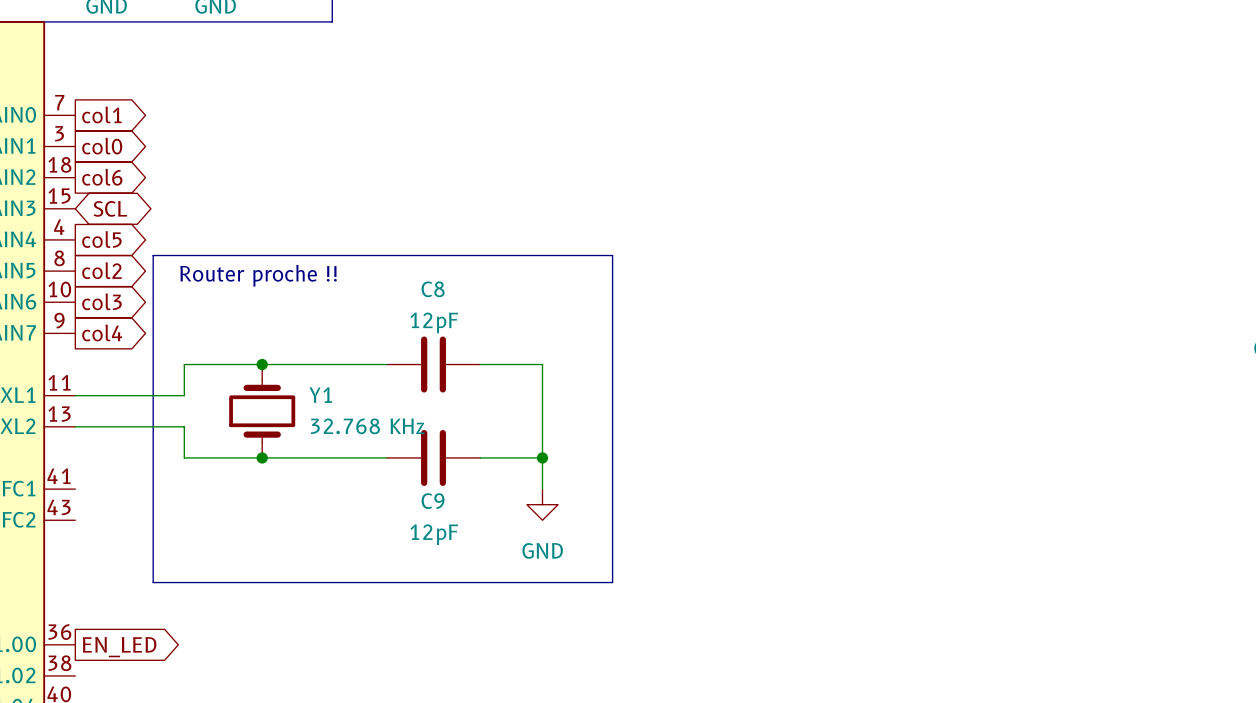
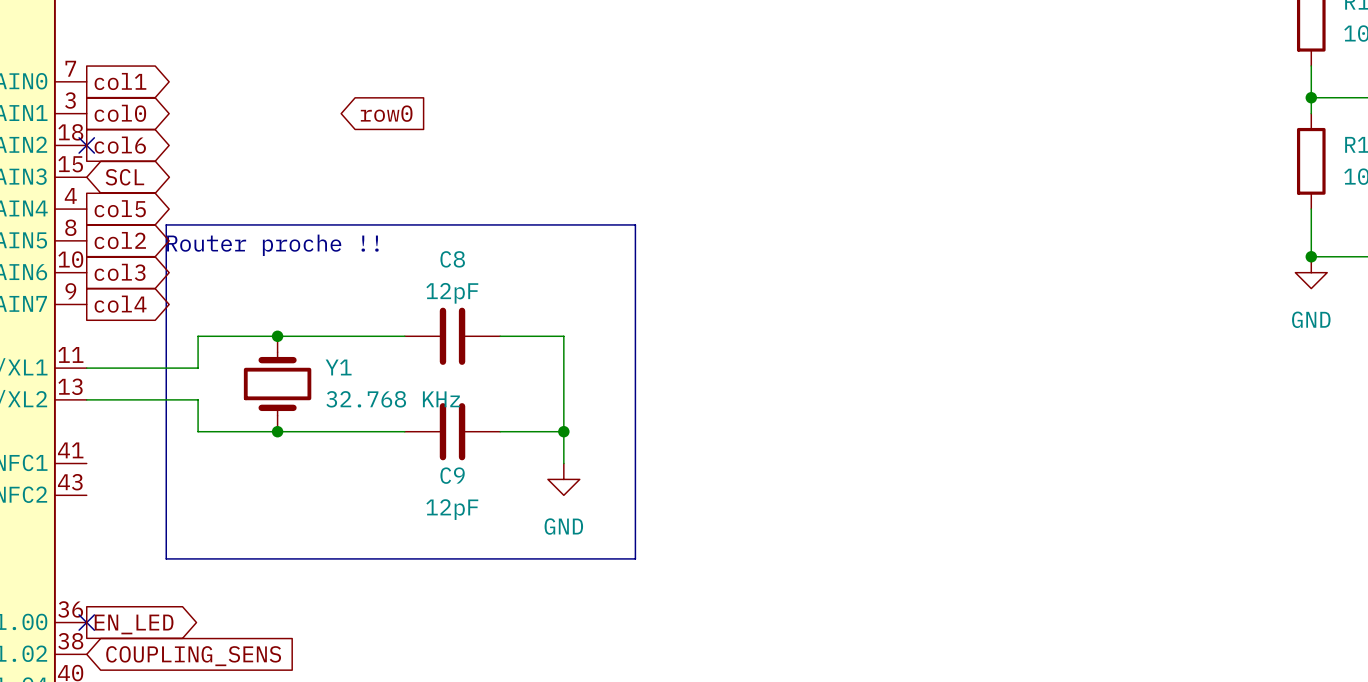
global label: none -> row0 (386, 113)
no-connect mark: none -> (86, 145)
no-connect mark: none -> (86, 622)
global label: none -> COUPLING_SENS (193, 656)

